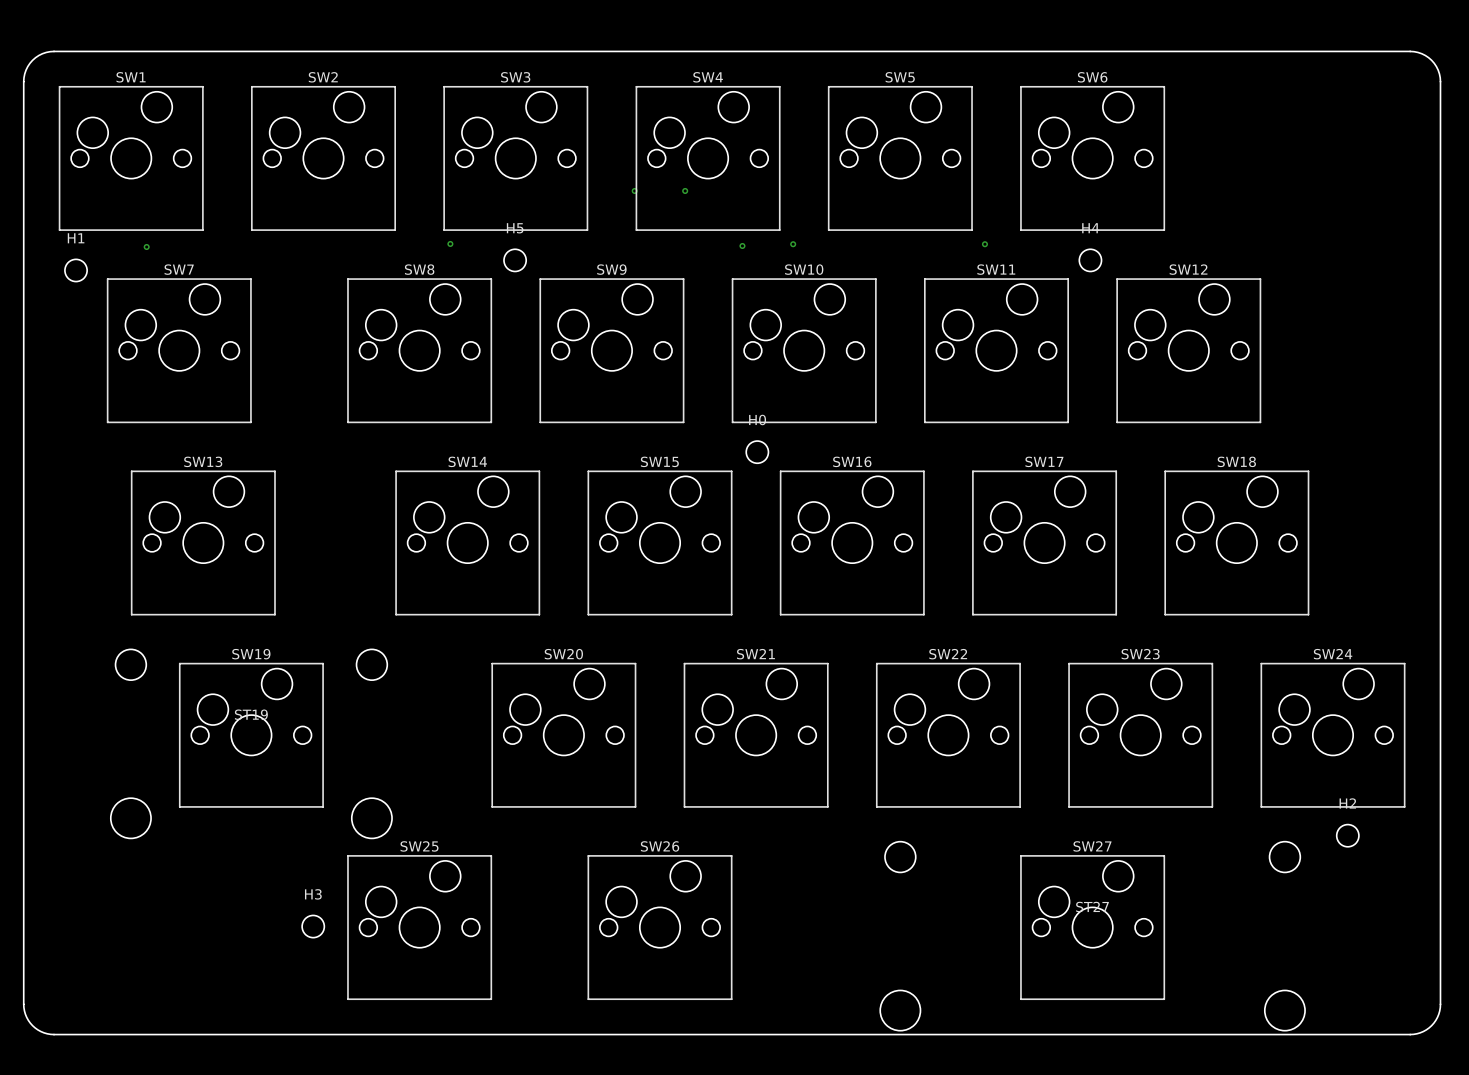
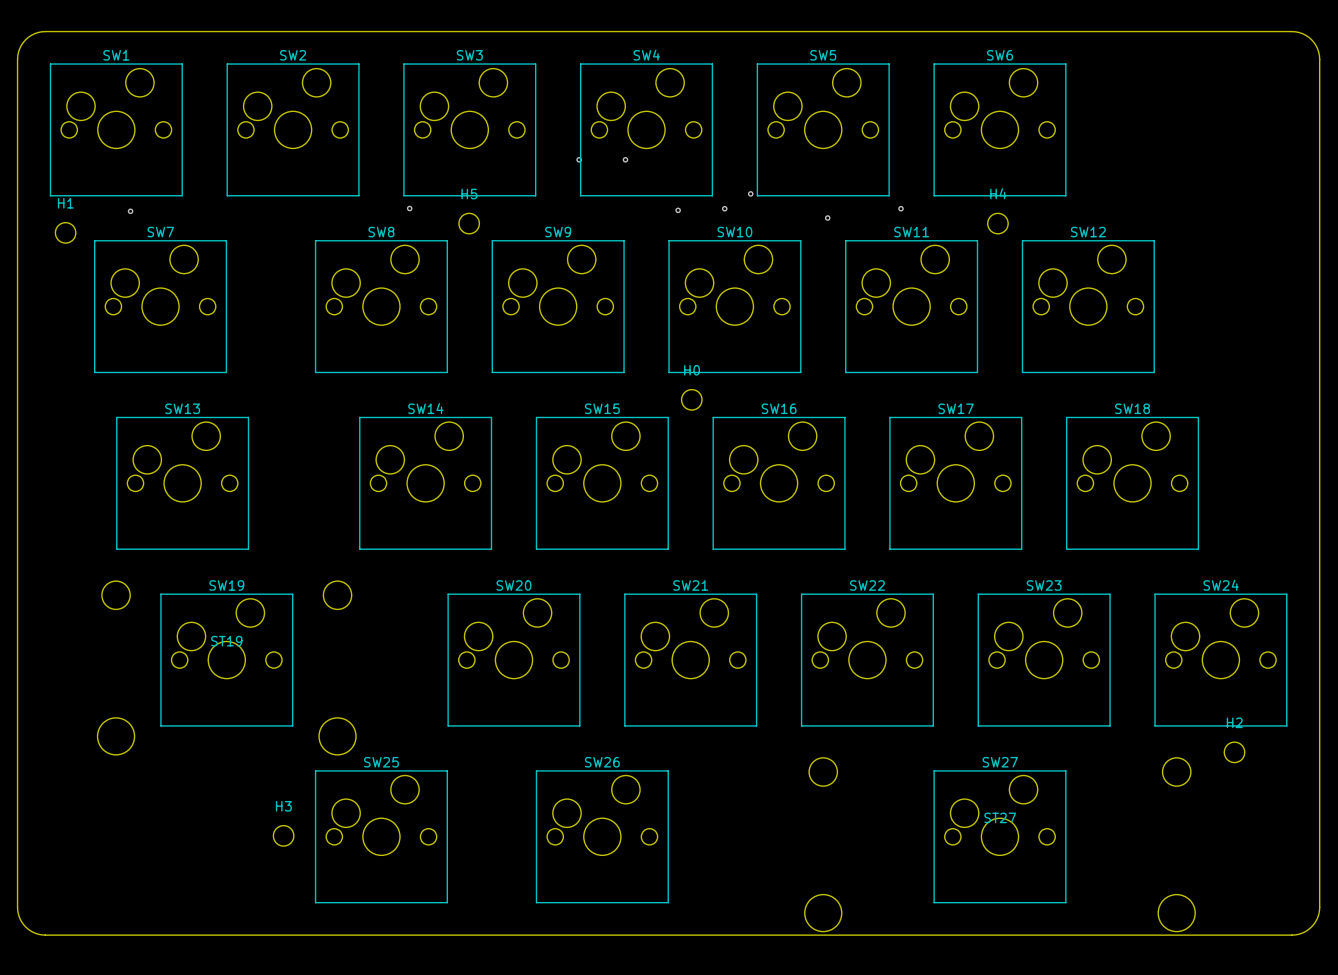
via: none -> (750, 193)
via: none -> (827, 218)

